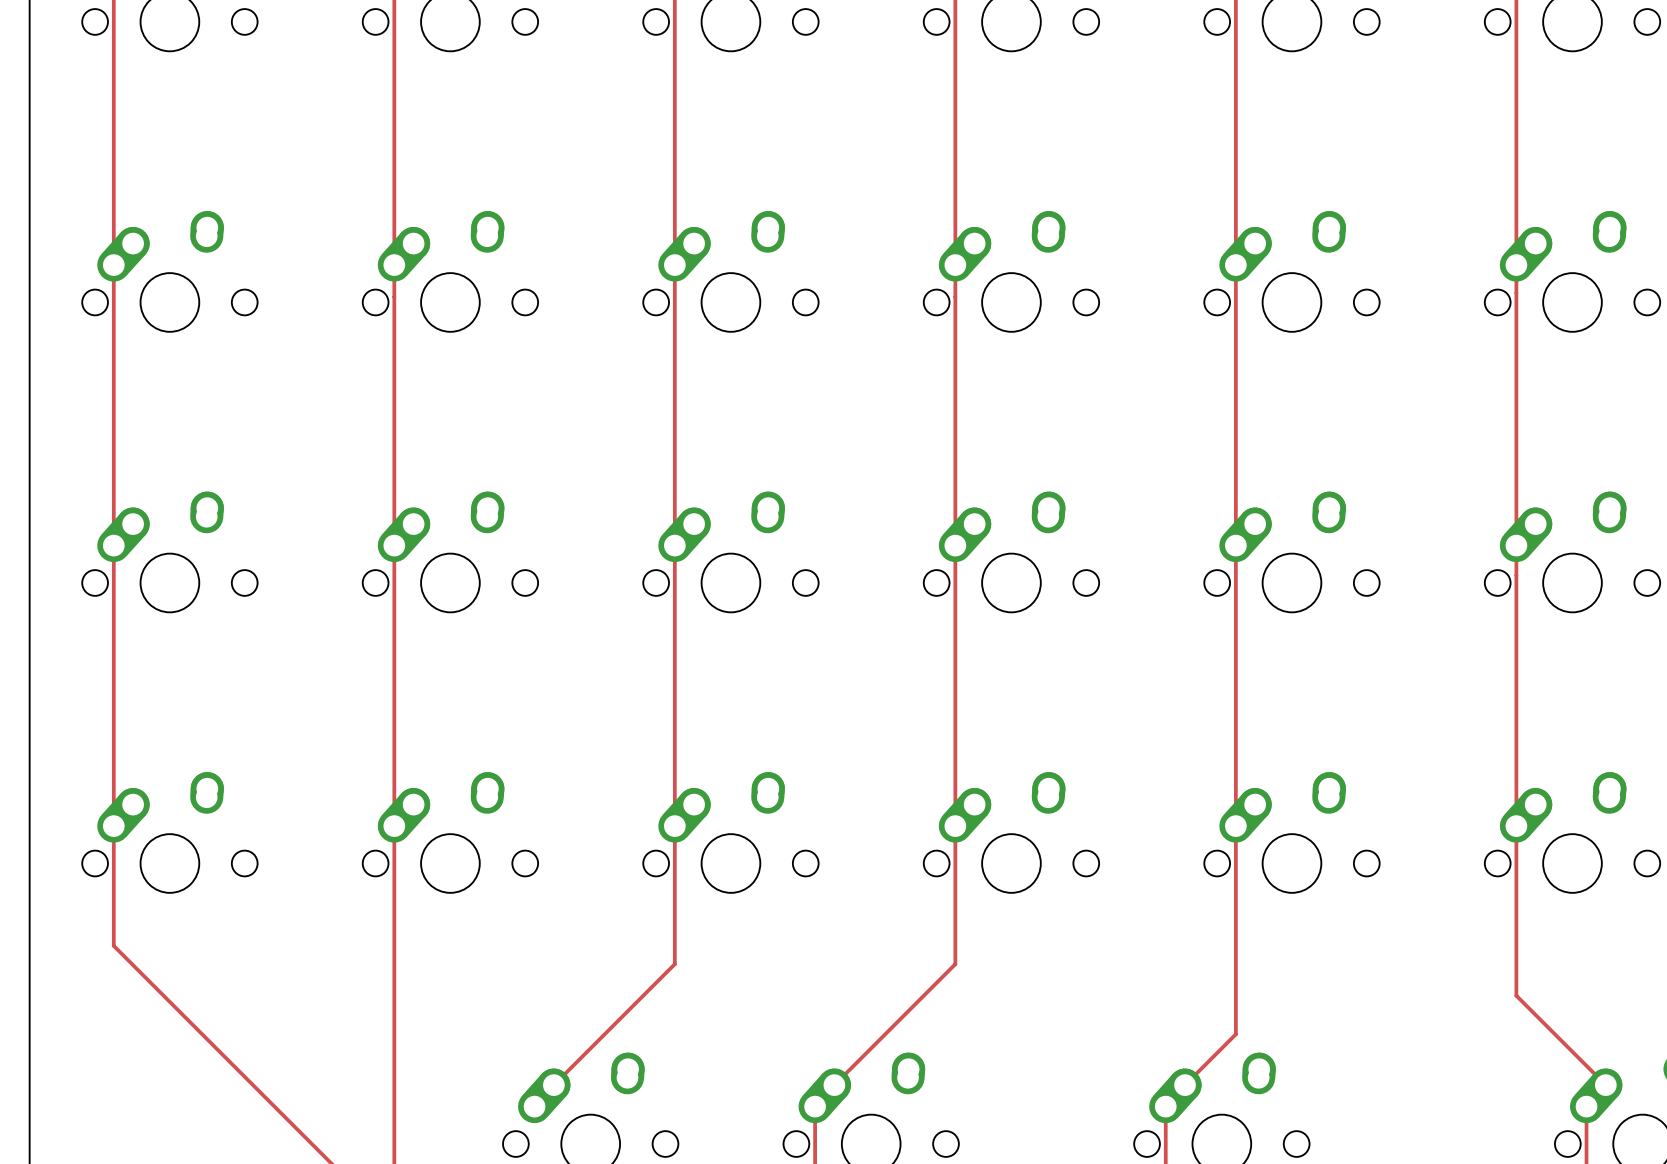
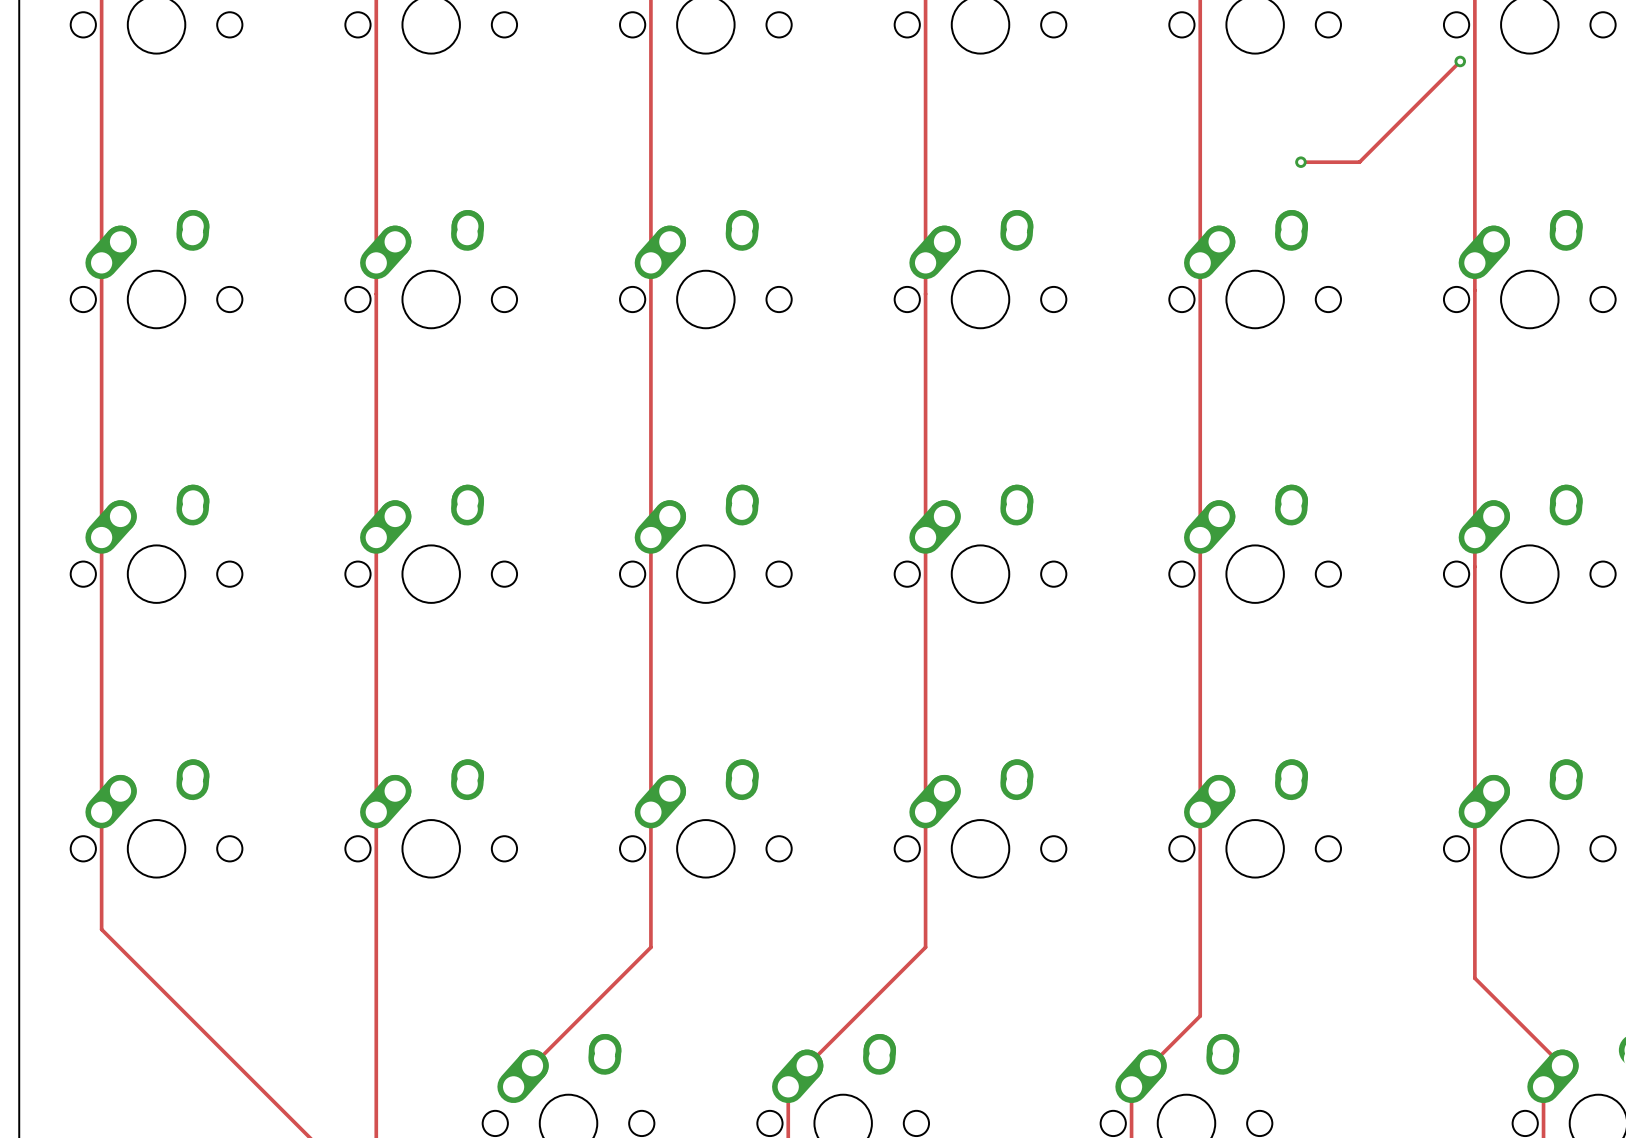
track: none -> (1460, 61) (1359, 162) (1300, 162)
via: none -> (1460, 61)
via: none -> (1300, 162)

